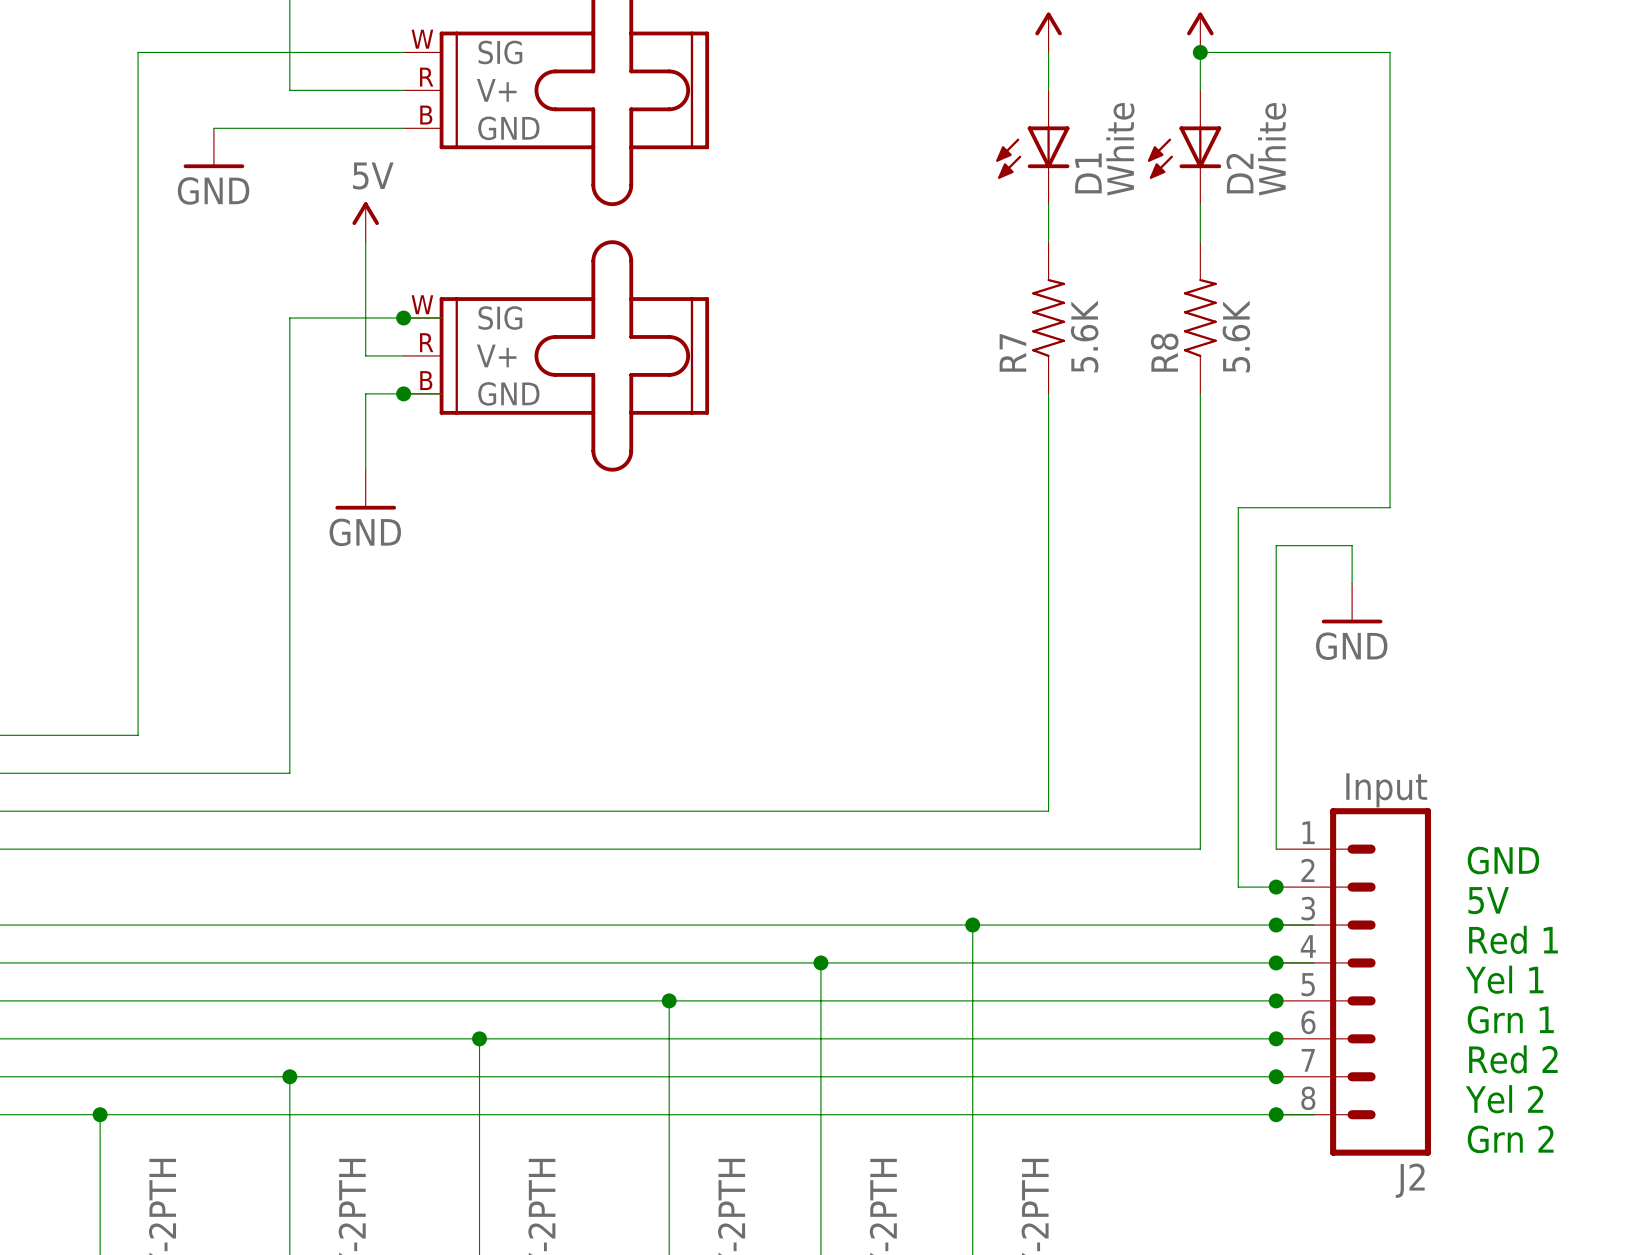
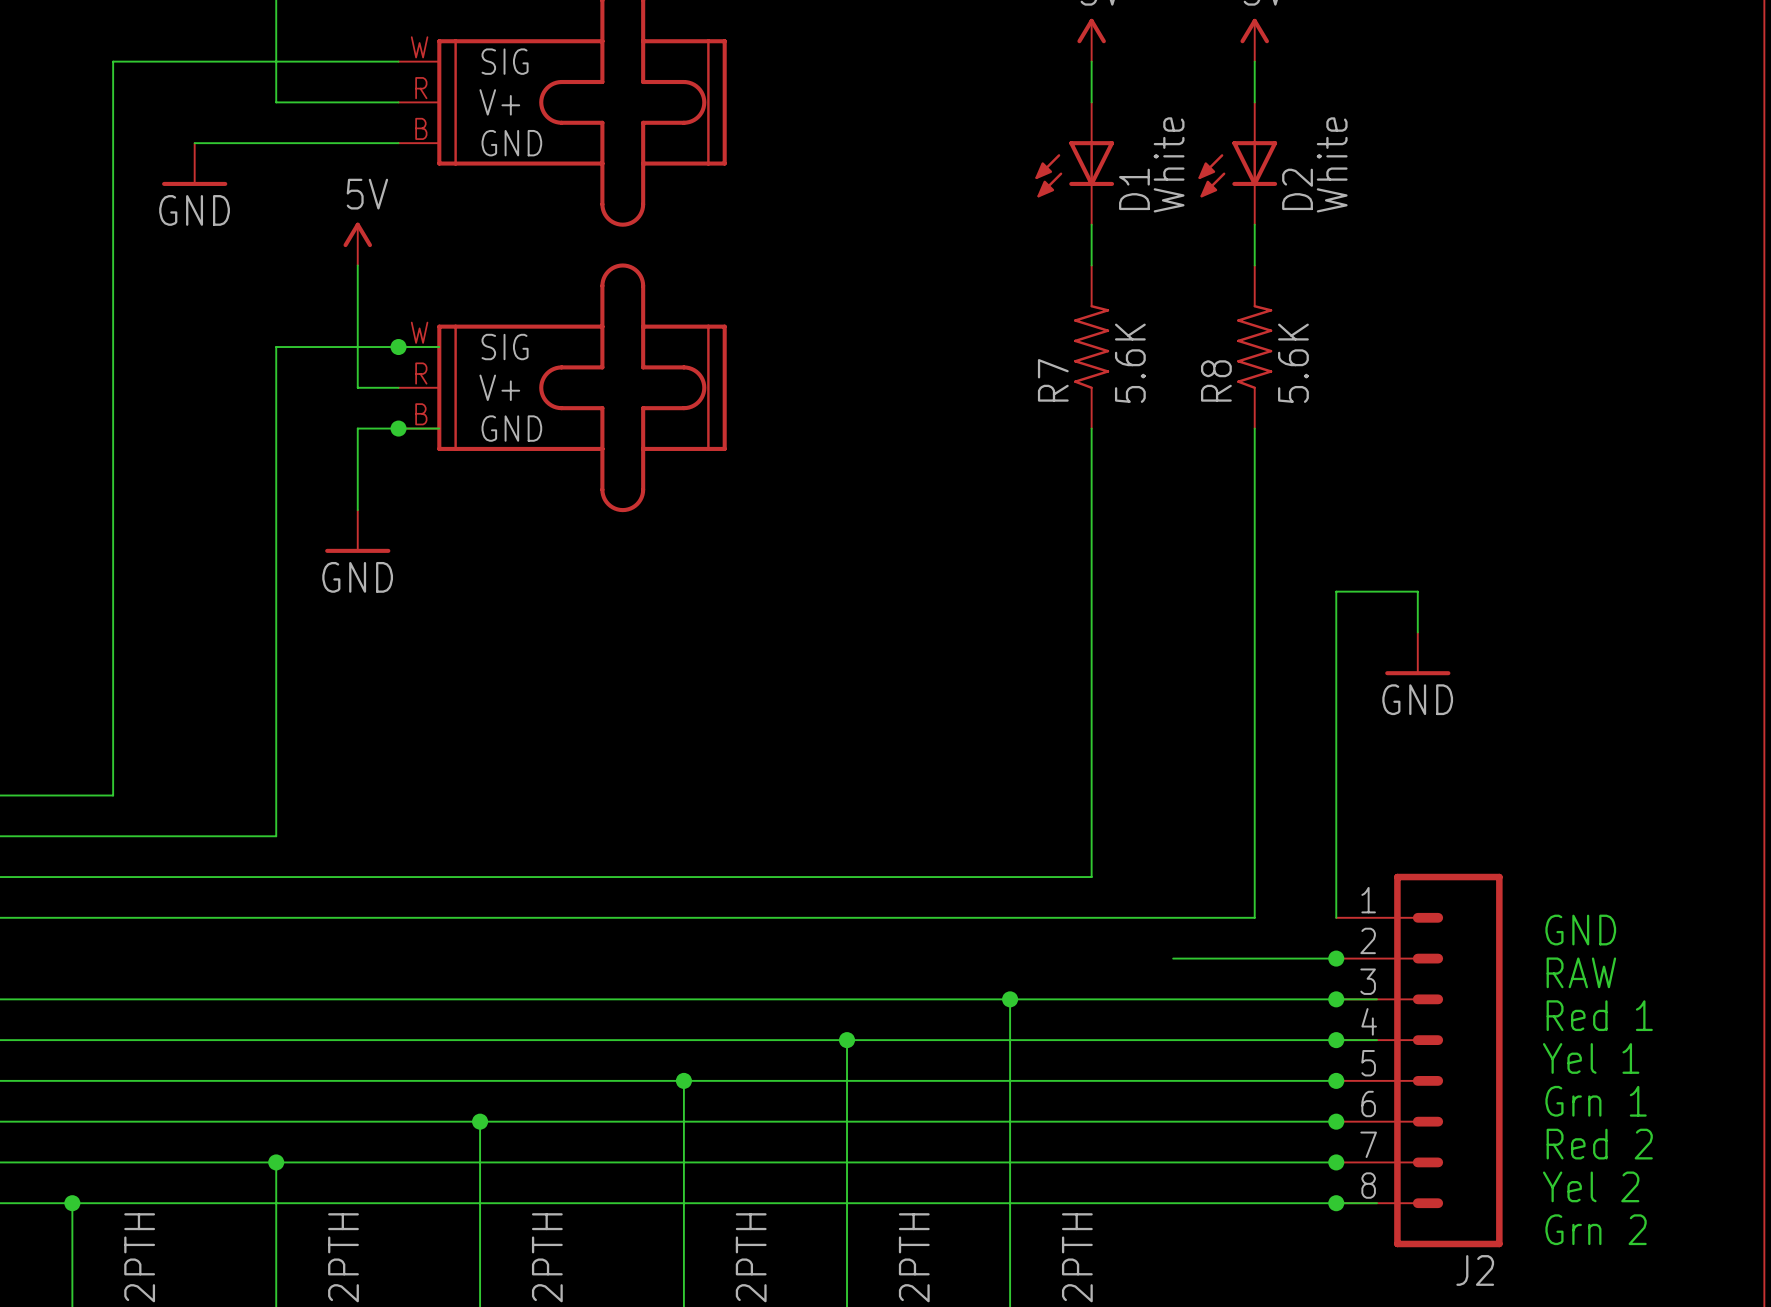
wire: (1200, 52) (1390, 52) (1390, 507) (1238, 507) (1238, 887) -> (1173, 958) (1295, 958)
junction: (1200, 52) -> none
J2 value: Input (1386, 790) -> none
text: 5V (1488, 900) -> RAW (1581, 972)

